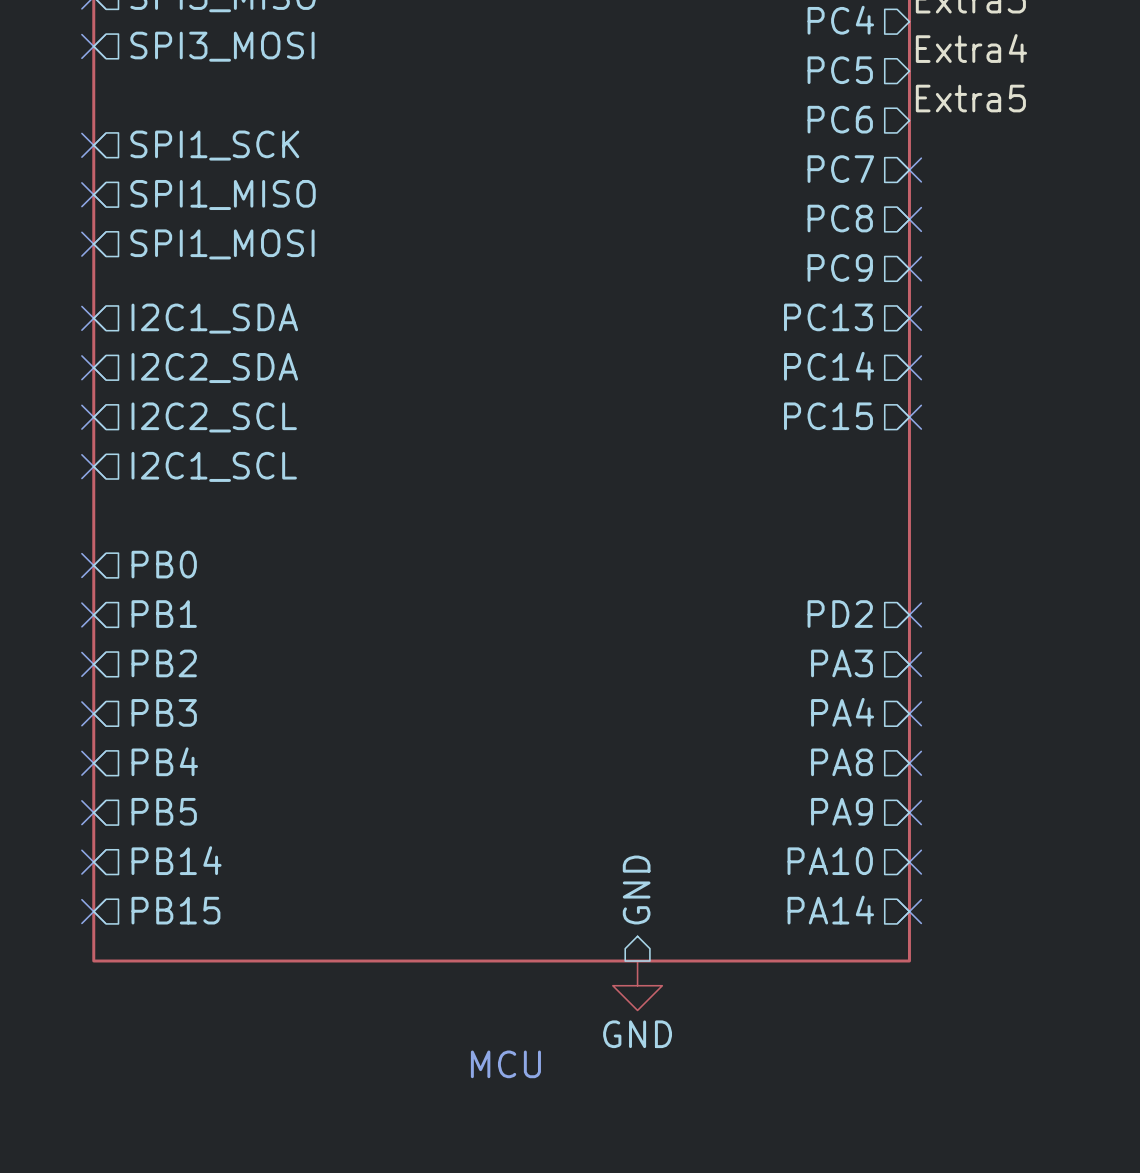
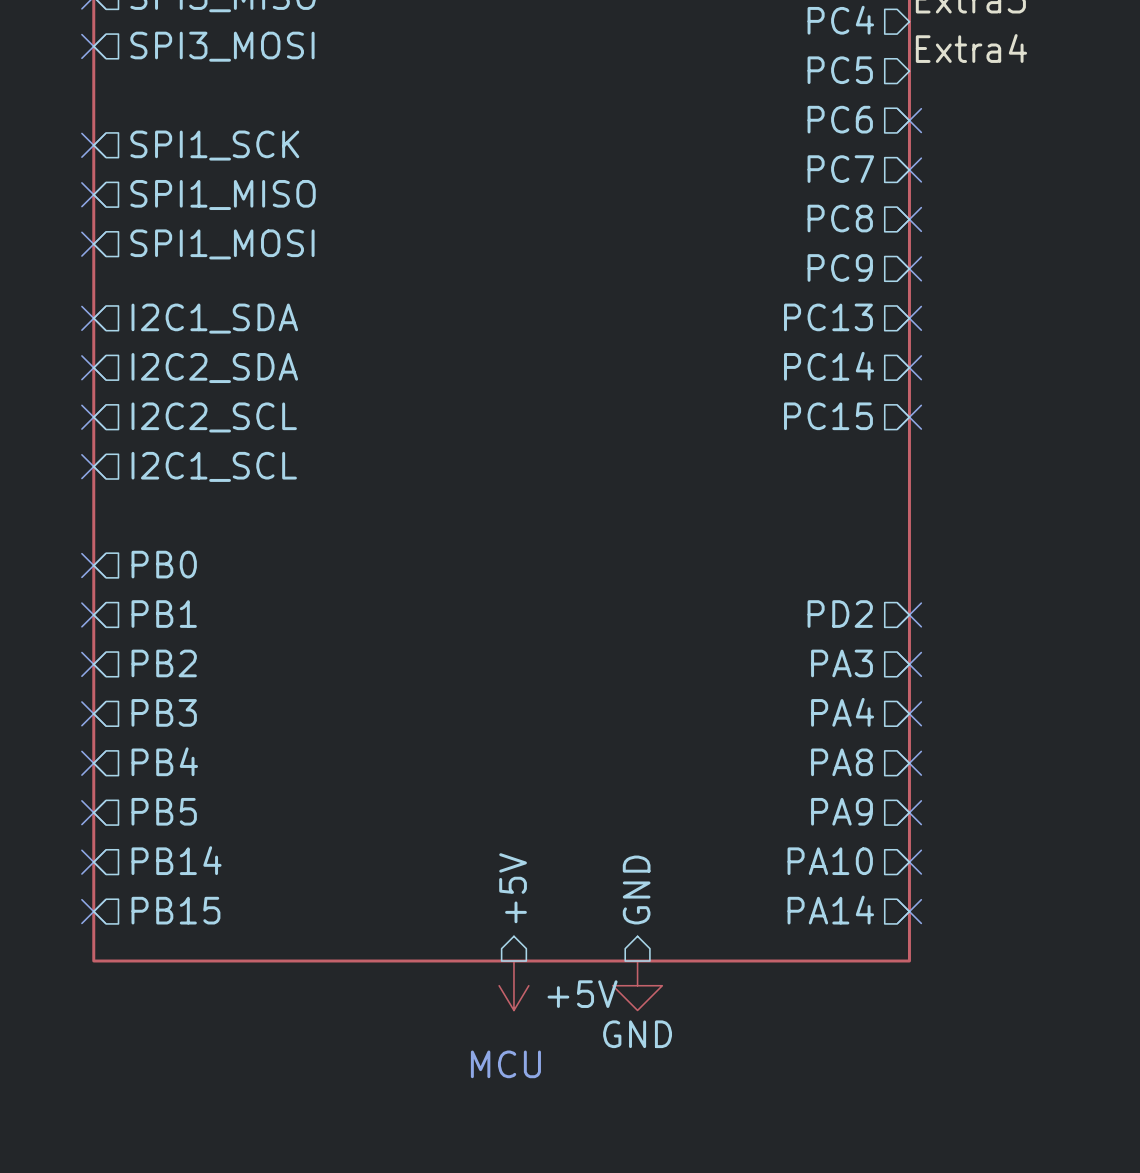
label: Extra5 (970, 98) -> none
no-connect mark: none -> (909, 120)
sheet pin: none -> +5V (513, 888)
power symbol: none -> +5V (513, 985)

